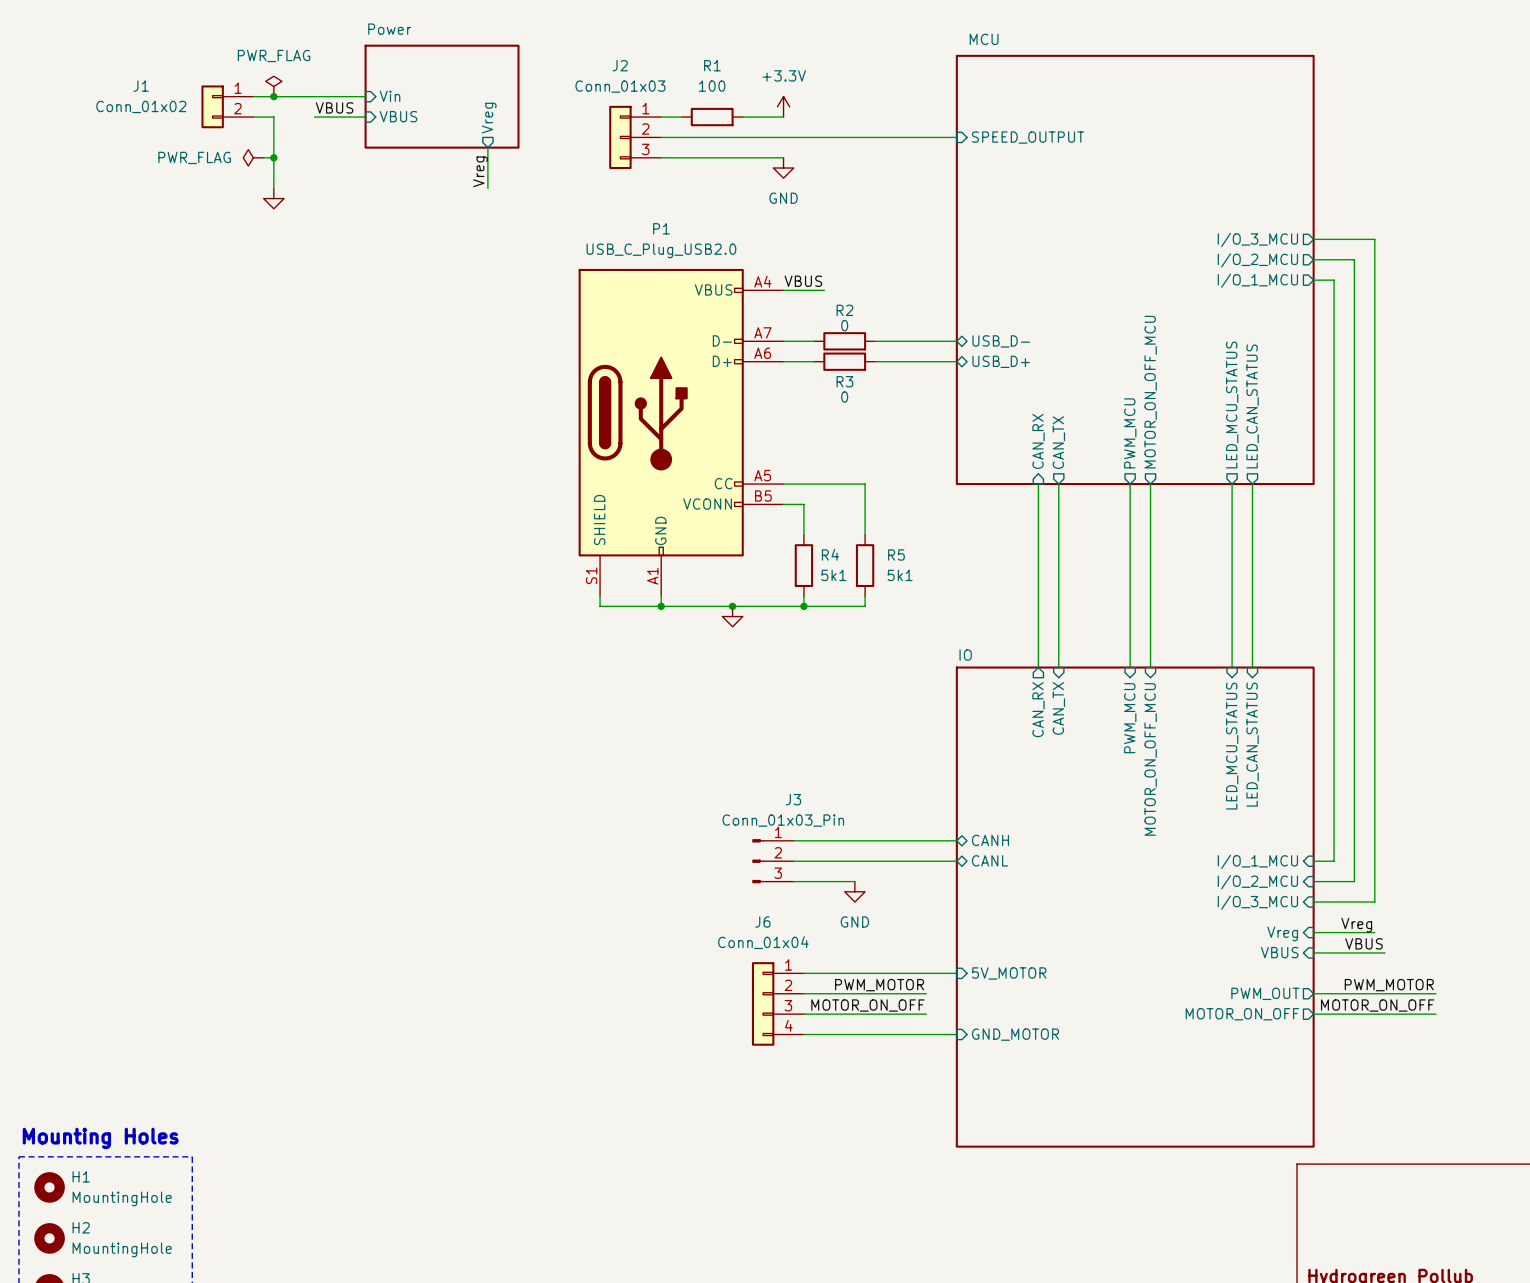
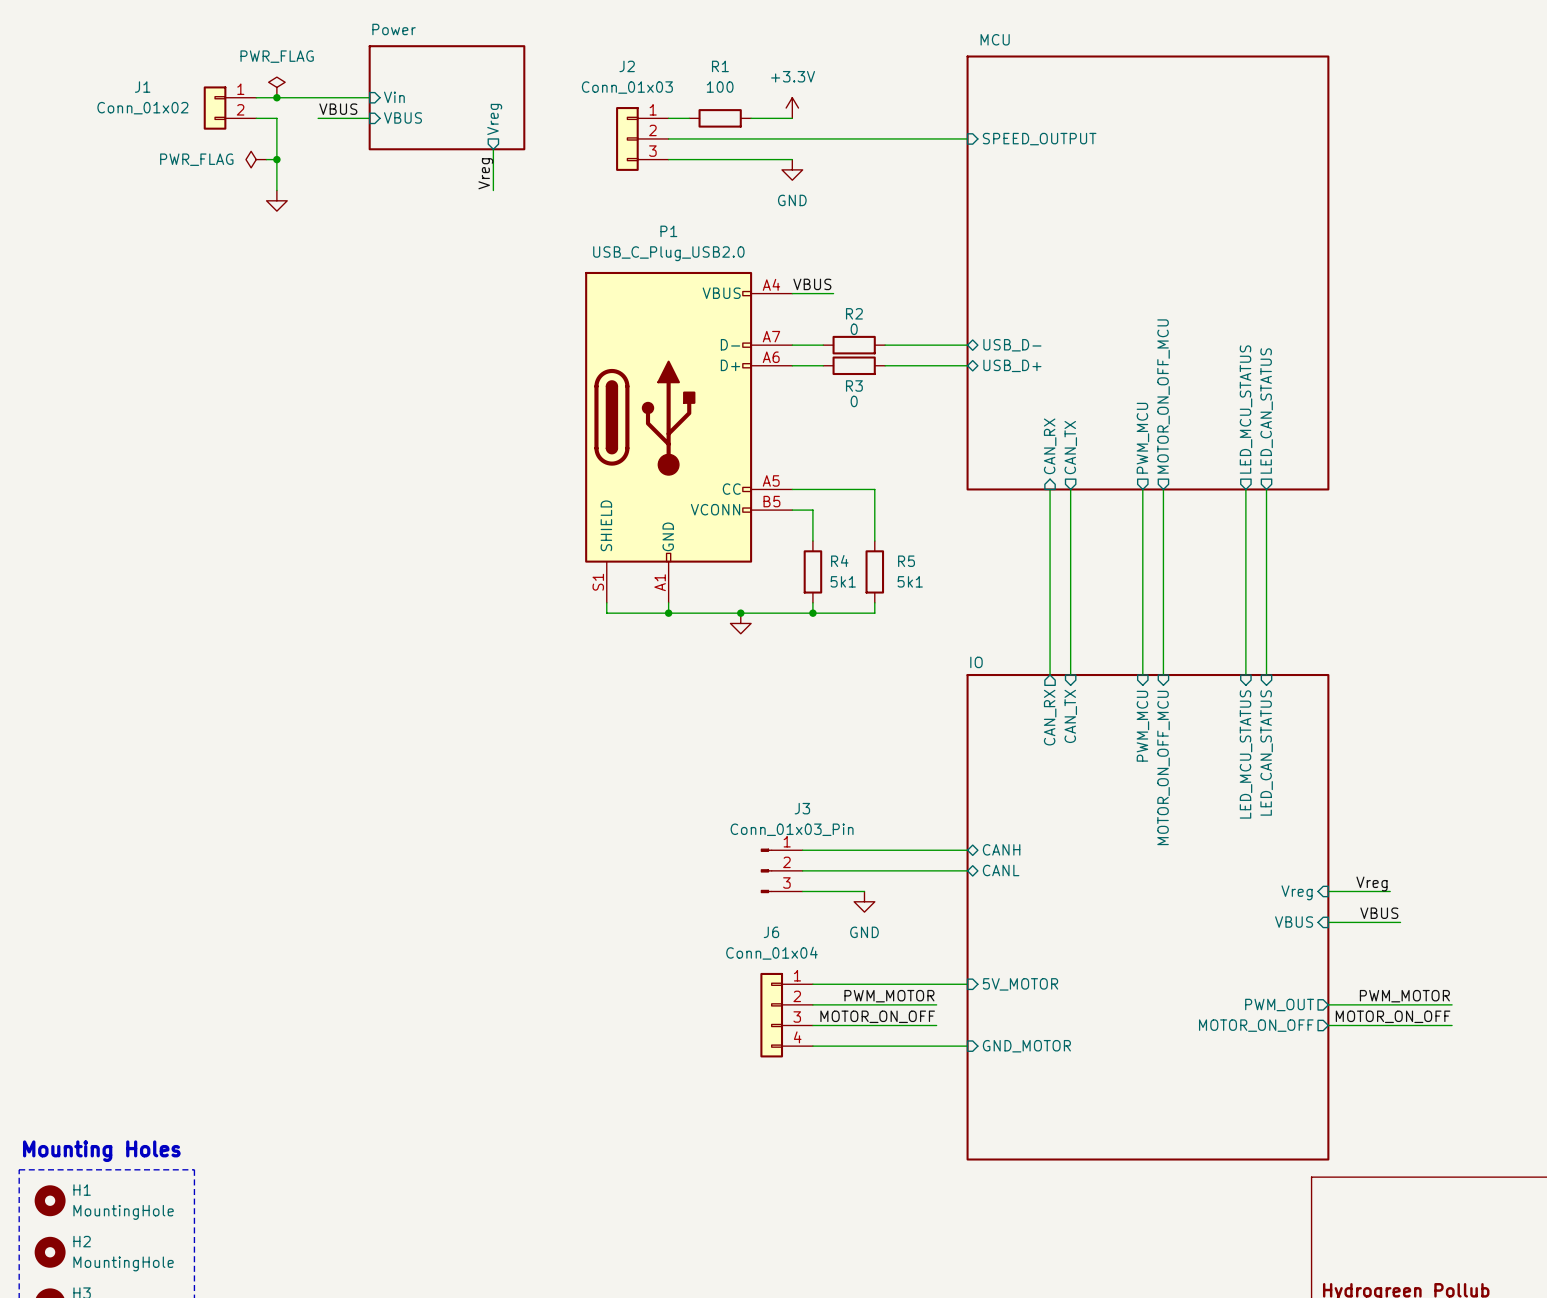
sheet pin: I/O_3_MCU (1257, 239) -> none
wire: (1313, 239) (1374, 239) (1374, 901) (1313, 901) -> none
wire: (1313, 259) (1354, 259) (1354, 881) -> (1390, 891) (1369, 891)
sheet pin: I/O_2_MCU (1257, 260) -> none
sheet pin: I/O_1_MCU (1257, 280) -> none
wire: (1313, 280) (1334, 280) (1334, 861) (1313, 861) -> none
sheet pin: I/O_1_MCU (1257, 861) -> none
sheet pin: I/O_2_MCU (1257, 882) -> Vreg (1297, 892)
sheet pin: I/O_3_MCU (1257, 902) -> none
label position: Vreg (1356, 925) -> Vreg (1371, 884)
wire: (1313, 932) (1374, 932) -> none
sheet pin: Vreg (1282, 933) -> none
label position: VBUS (1364, 943) -> VBUS (1379, 913)
sheet pin position: VBUS (1279, 952) -> VBUS (1294, 922)
wire: (1313, 952) (1384, 952) -> (1328, 922) (1400, 922)

